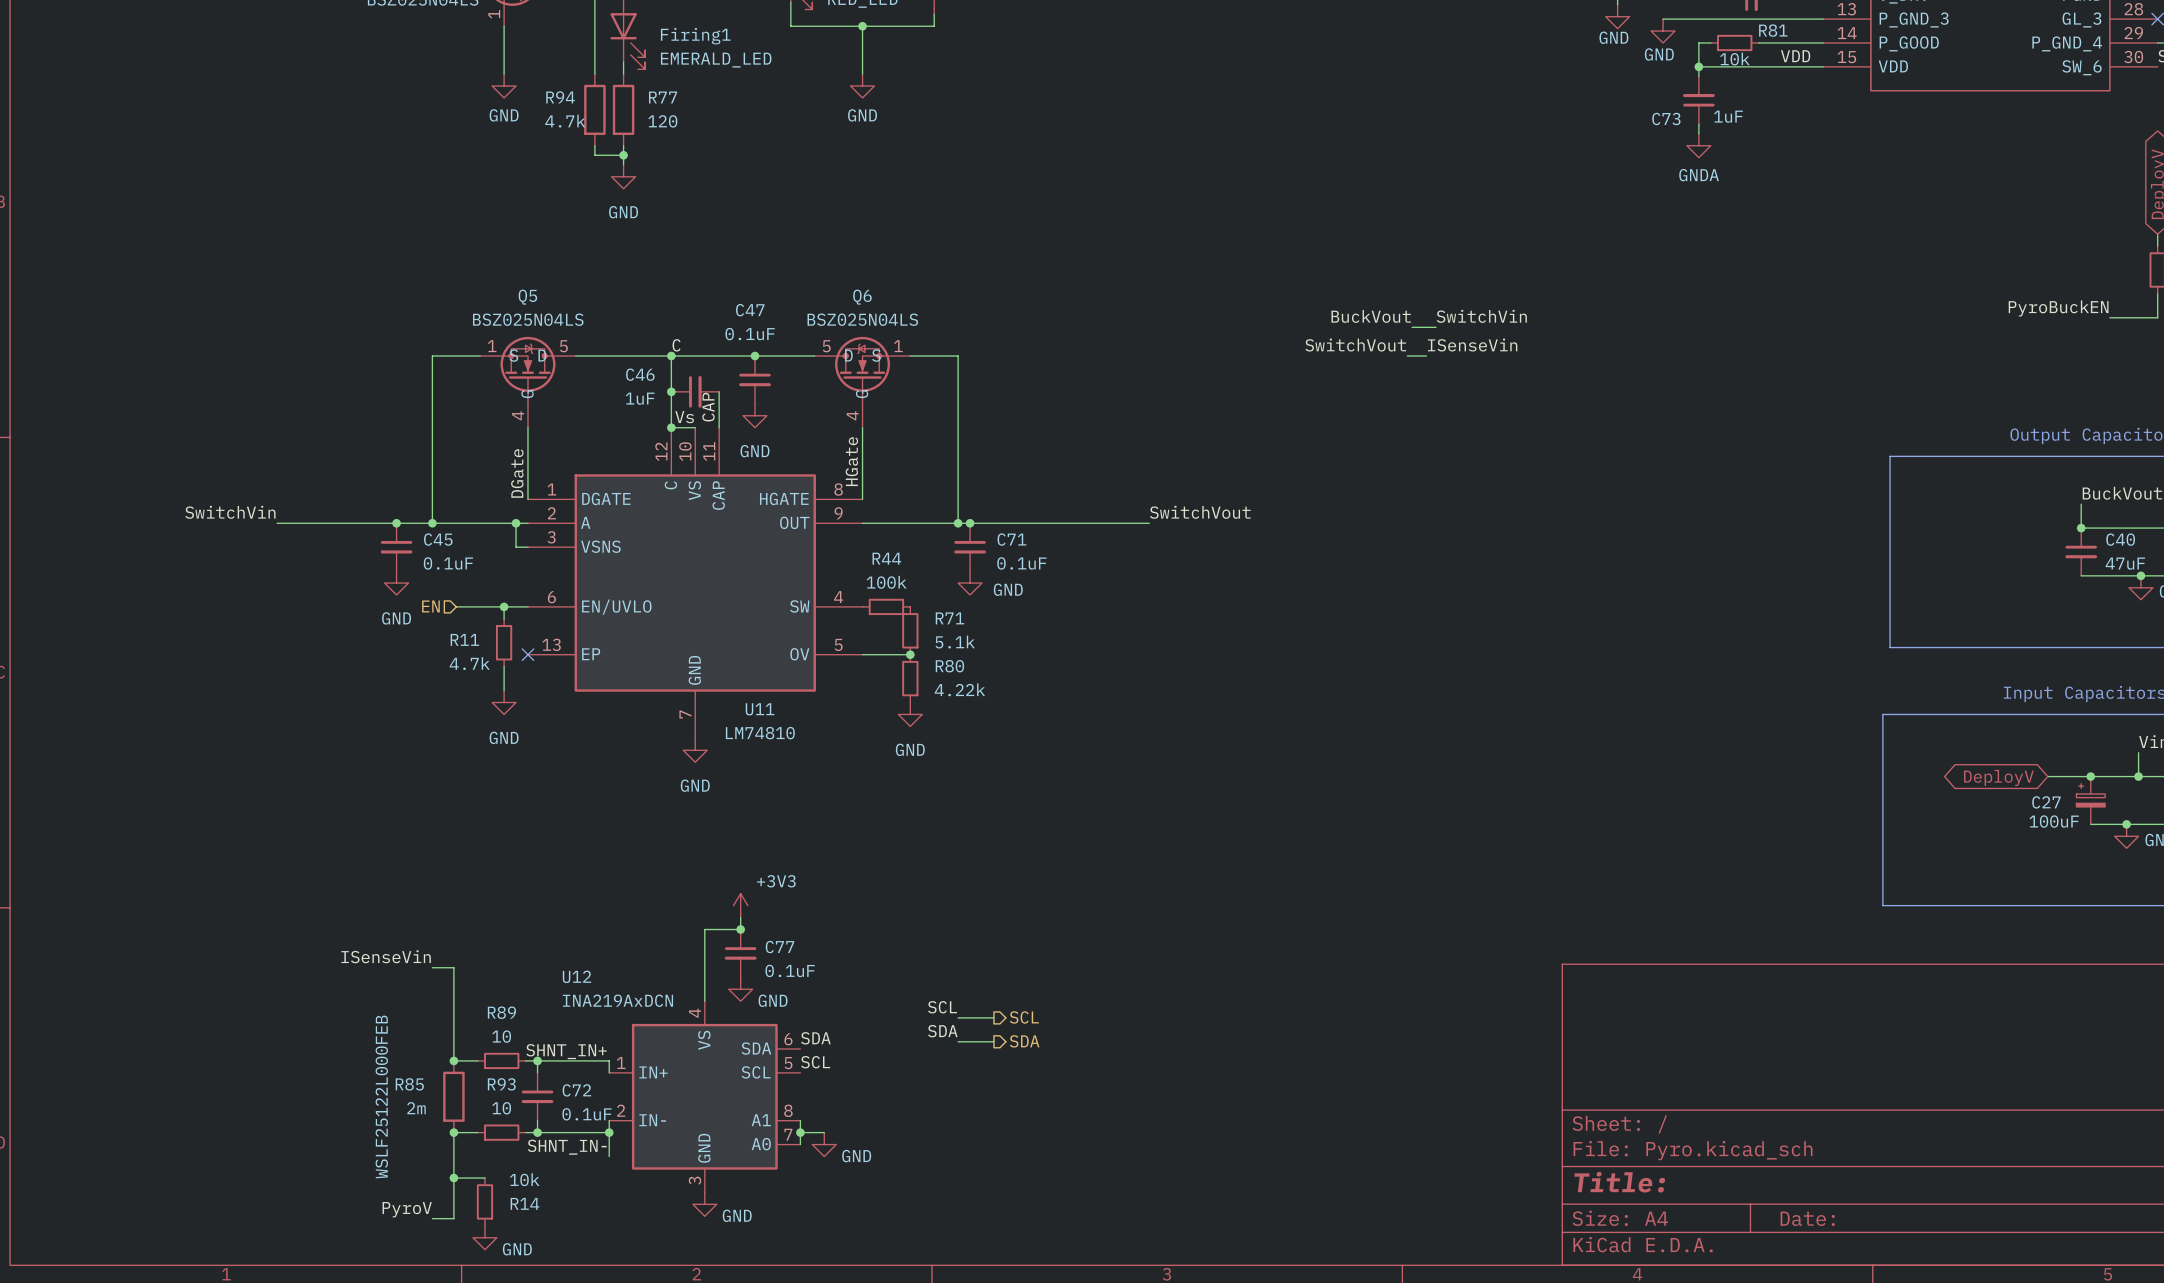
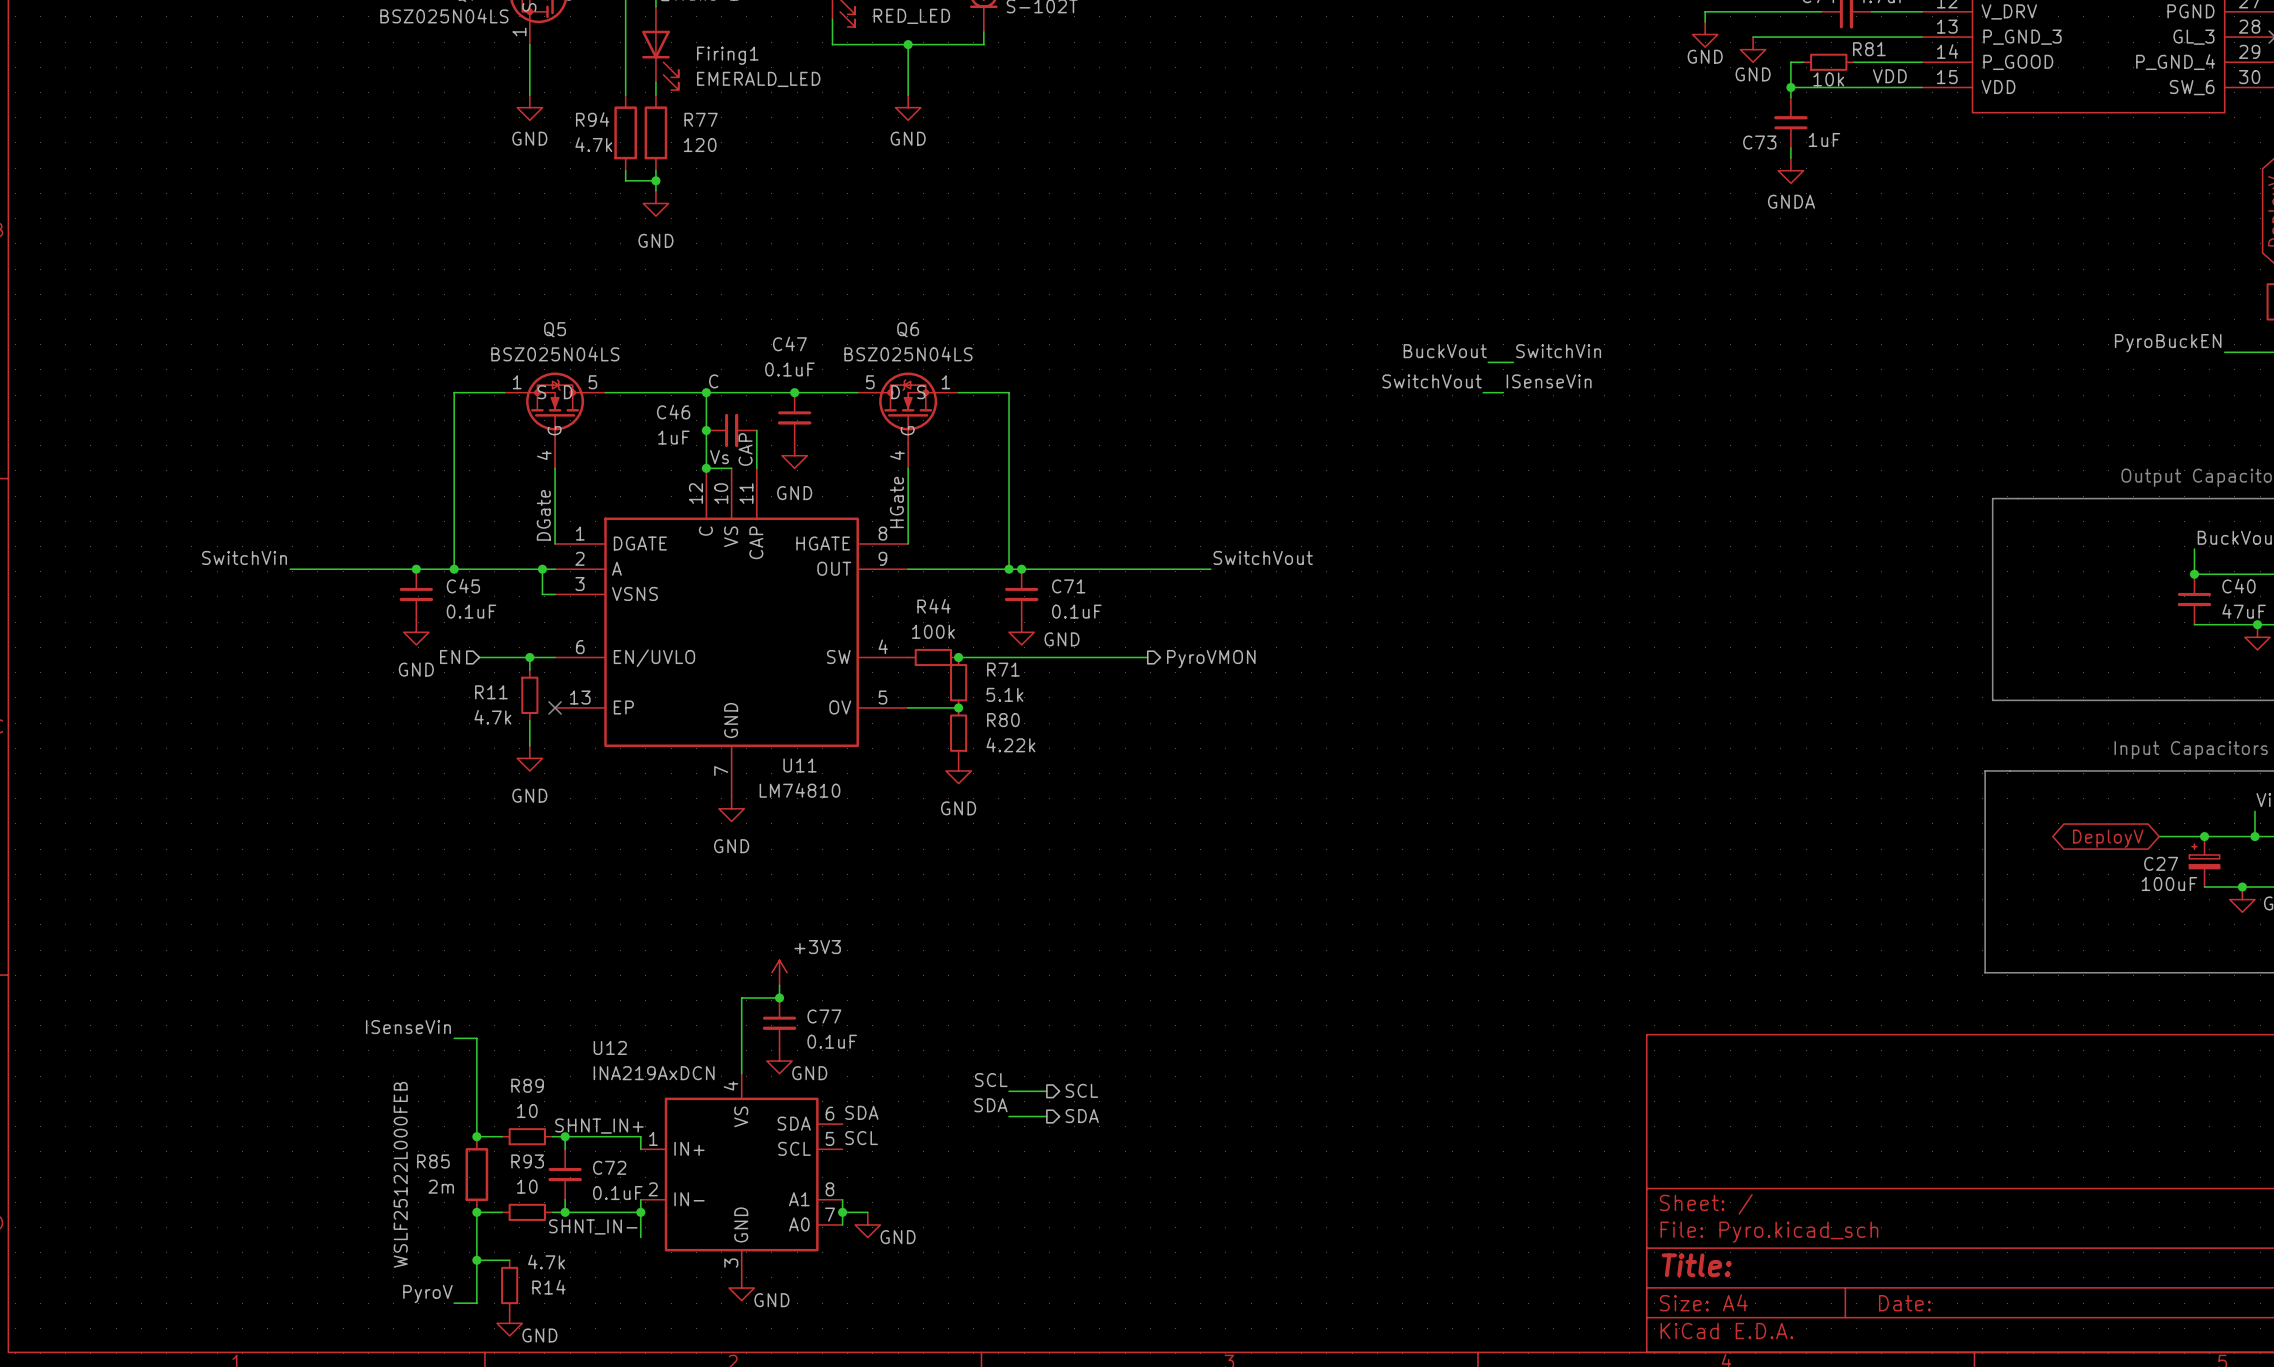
wire: none -> (958, 657) (1147, 657)
junction: none -> (958, 657)
hierarchical label: none -> PyroVMON (1211, 659)
R14 value: 10k (524, 1179) -> 4.7k (546, 1262)

